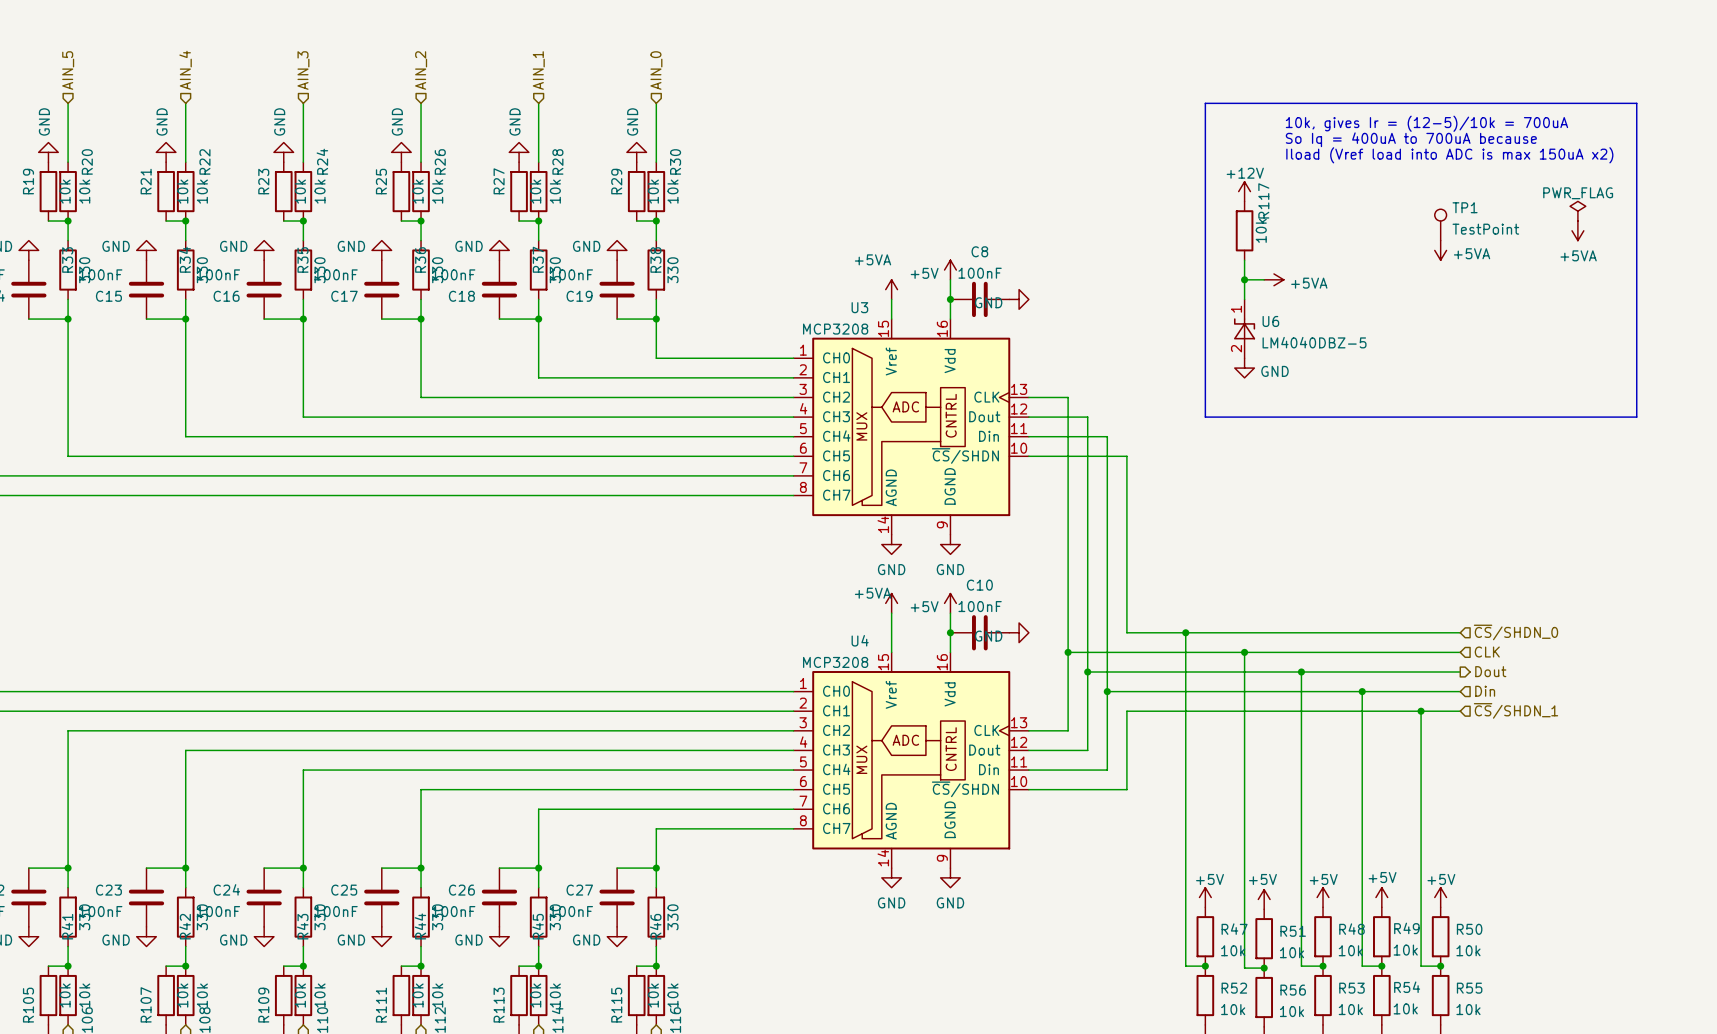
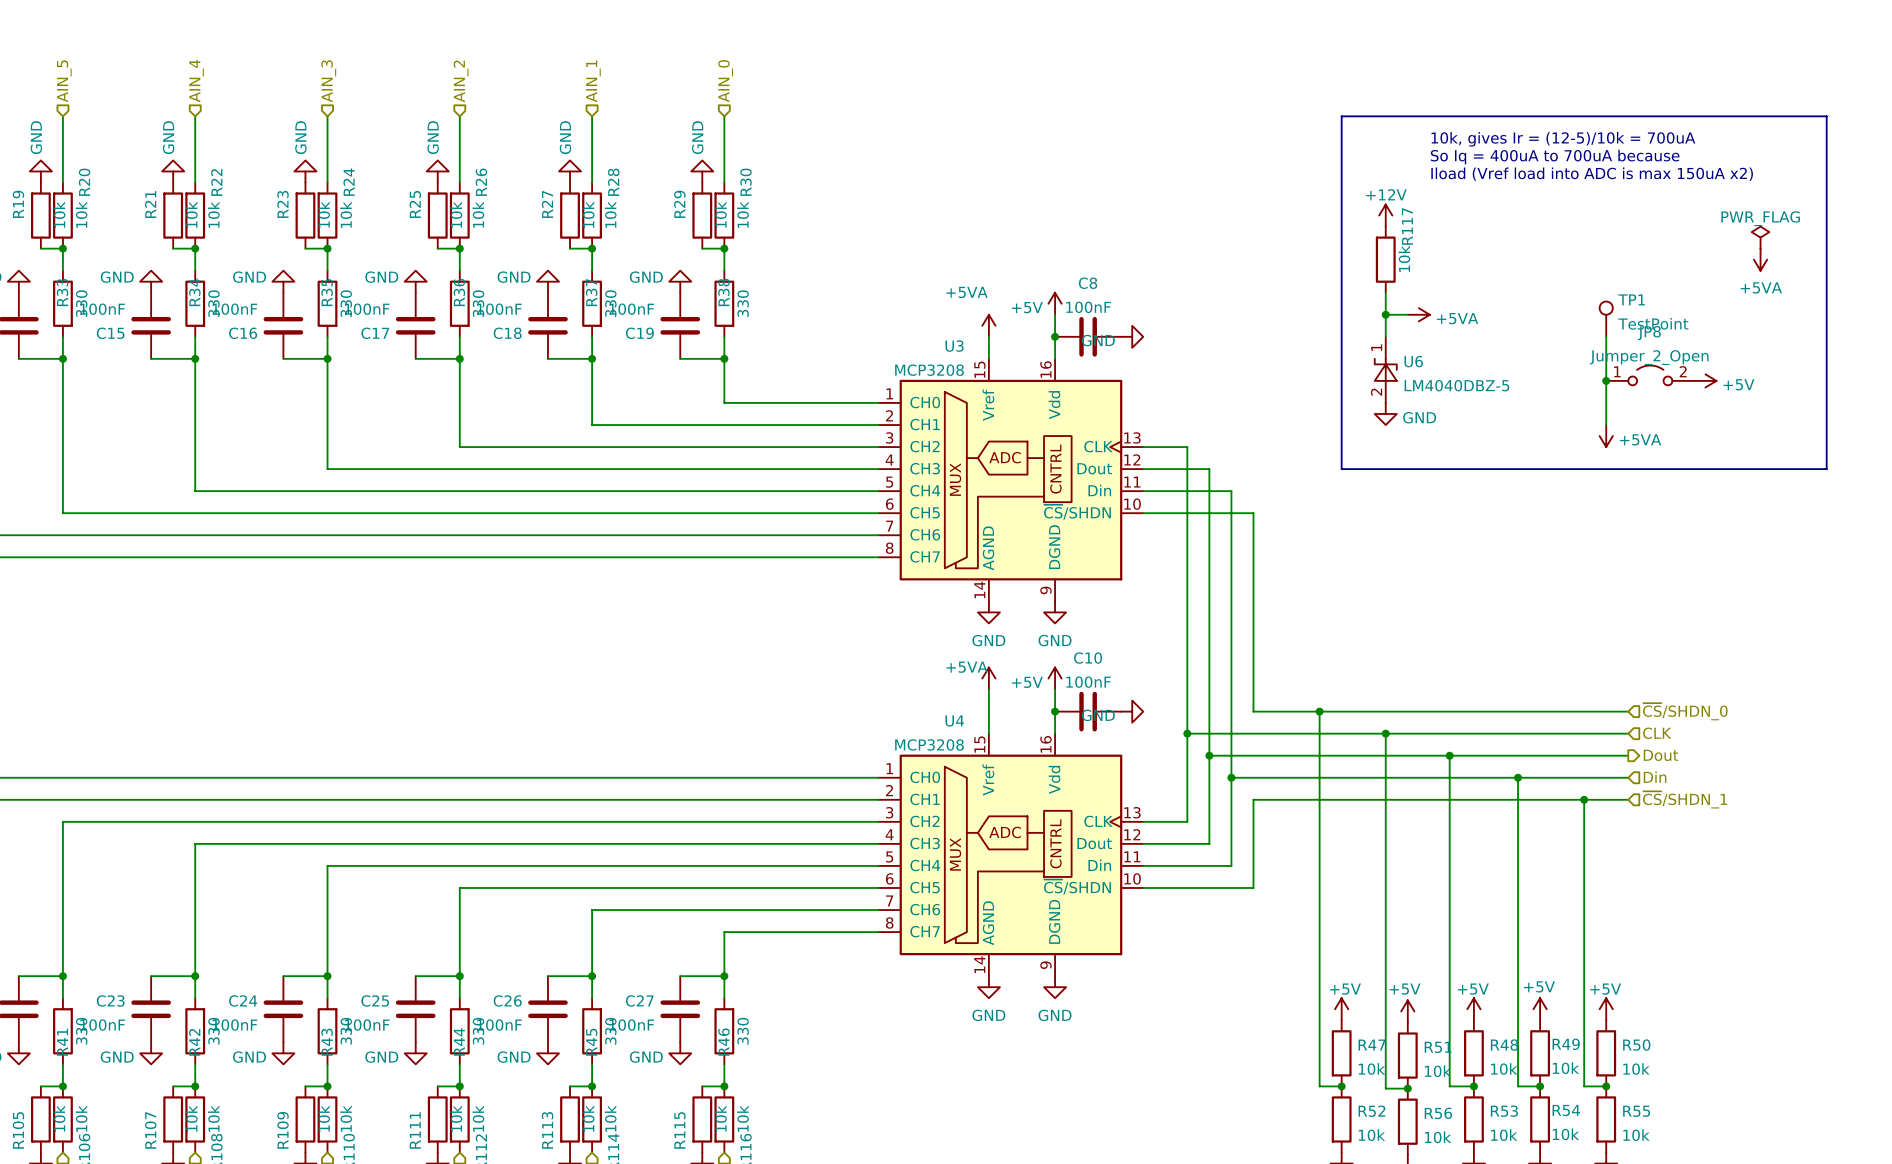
TP1 position: (1440, 224) -> (1606, 319)
power symbol position: +5VA (1440, 250) -> +5VA (1606, 436)
wire: none -> (1606, 336) (1606, 425)
JP8: none -> Jumper_2_Open (1650, 375)
junction: none -> (1606, 380)
power symbol: none -> +5V (1705, 380)

